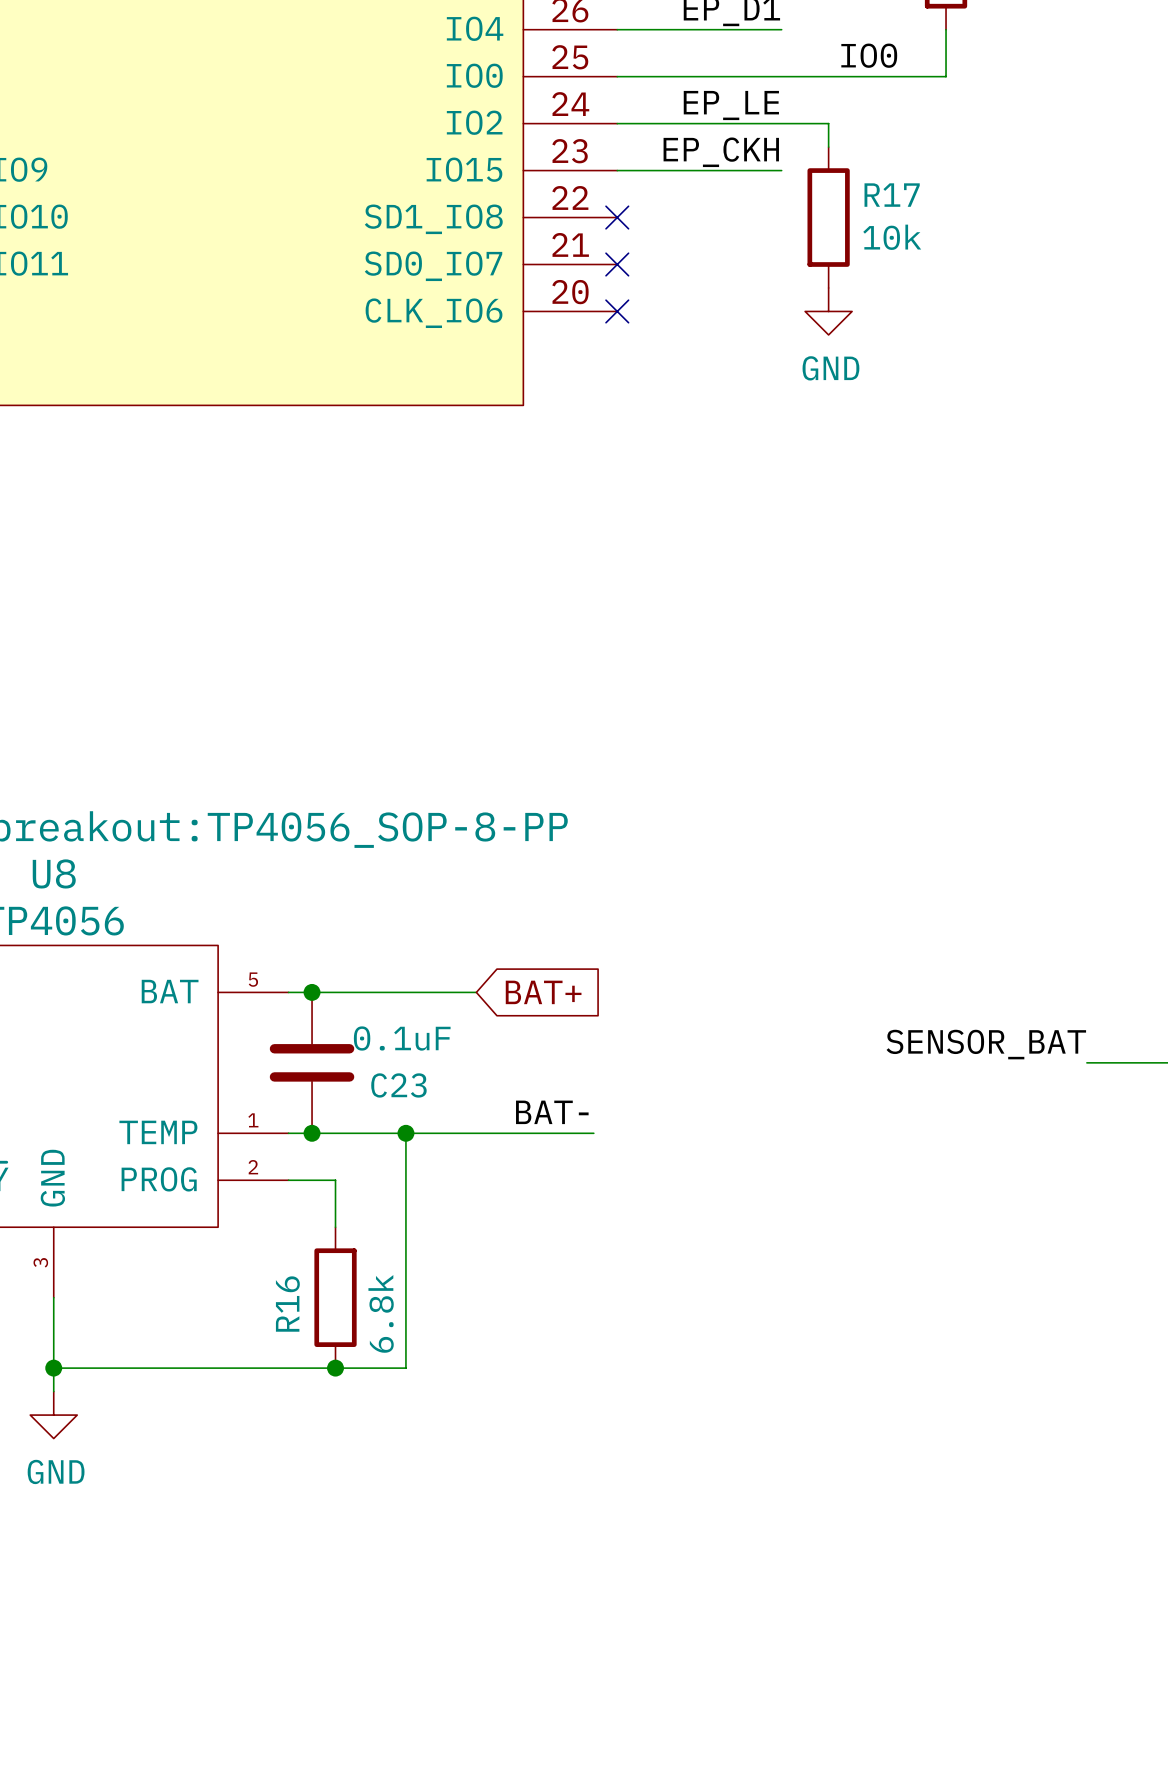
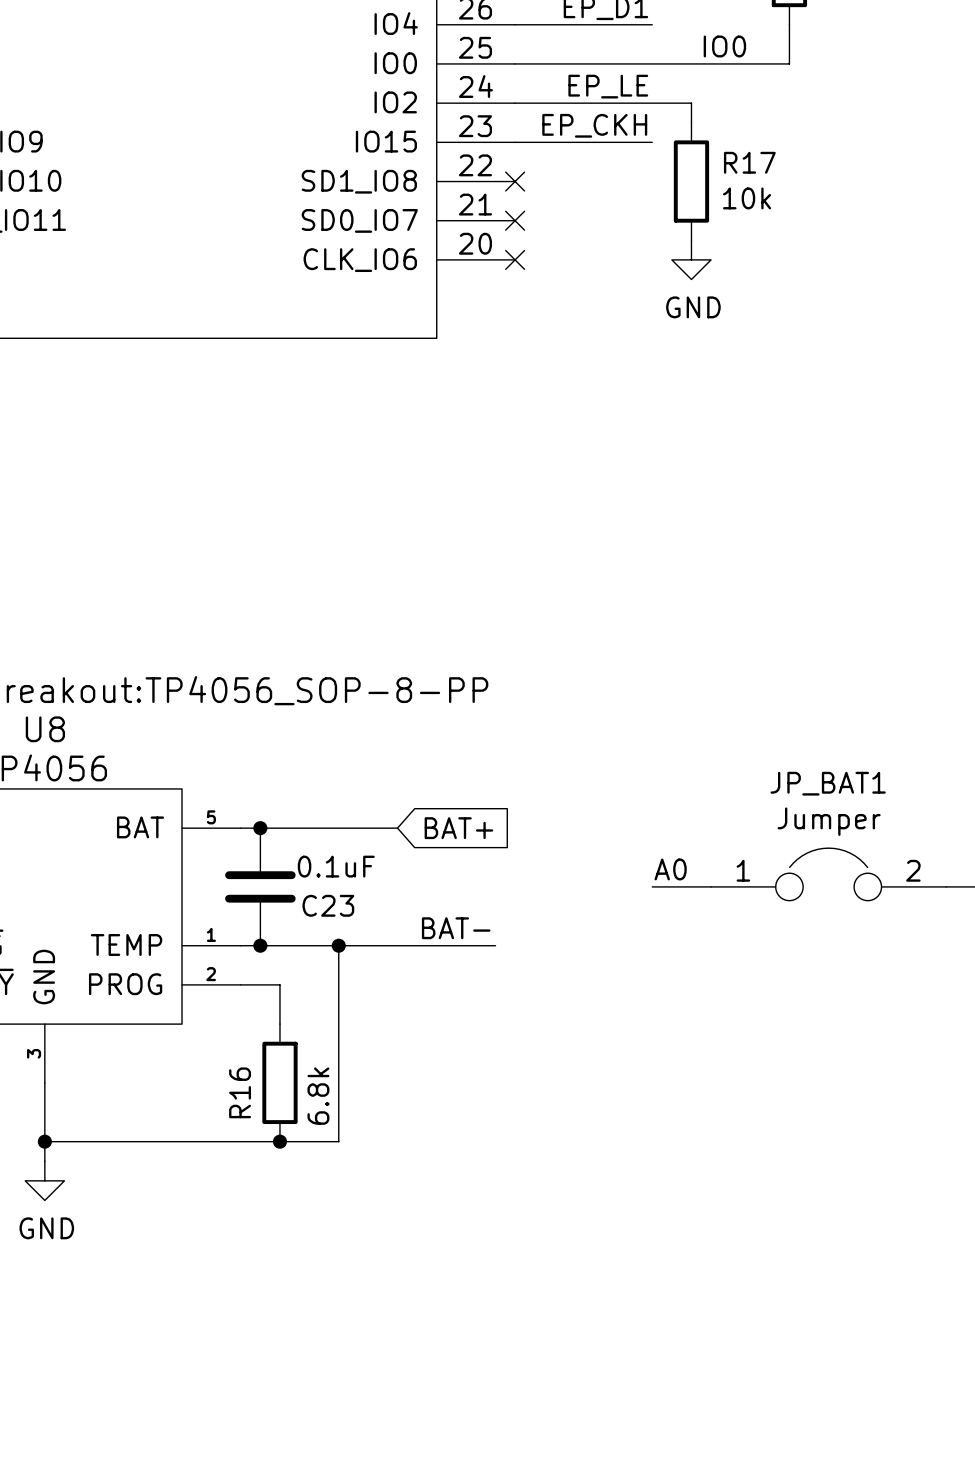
label: none -> A0 (670, 869)
label: SENSOR_BAT (986, 1044) -> none
JP_BAT1: none -> Jumper (828, 874)
wire: none -> (652, 886) (711, 886)

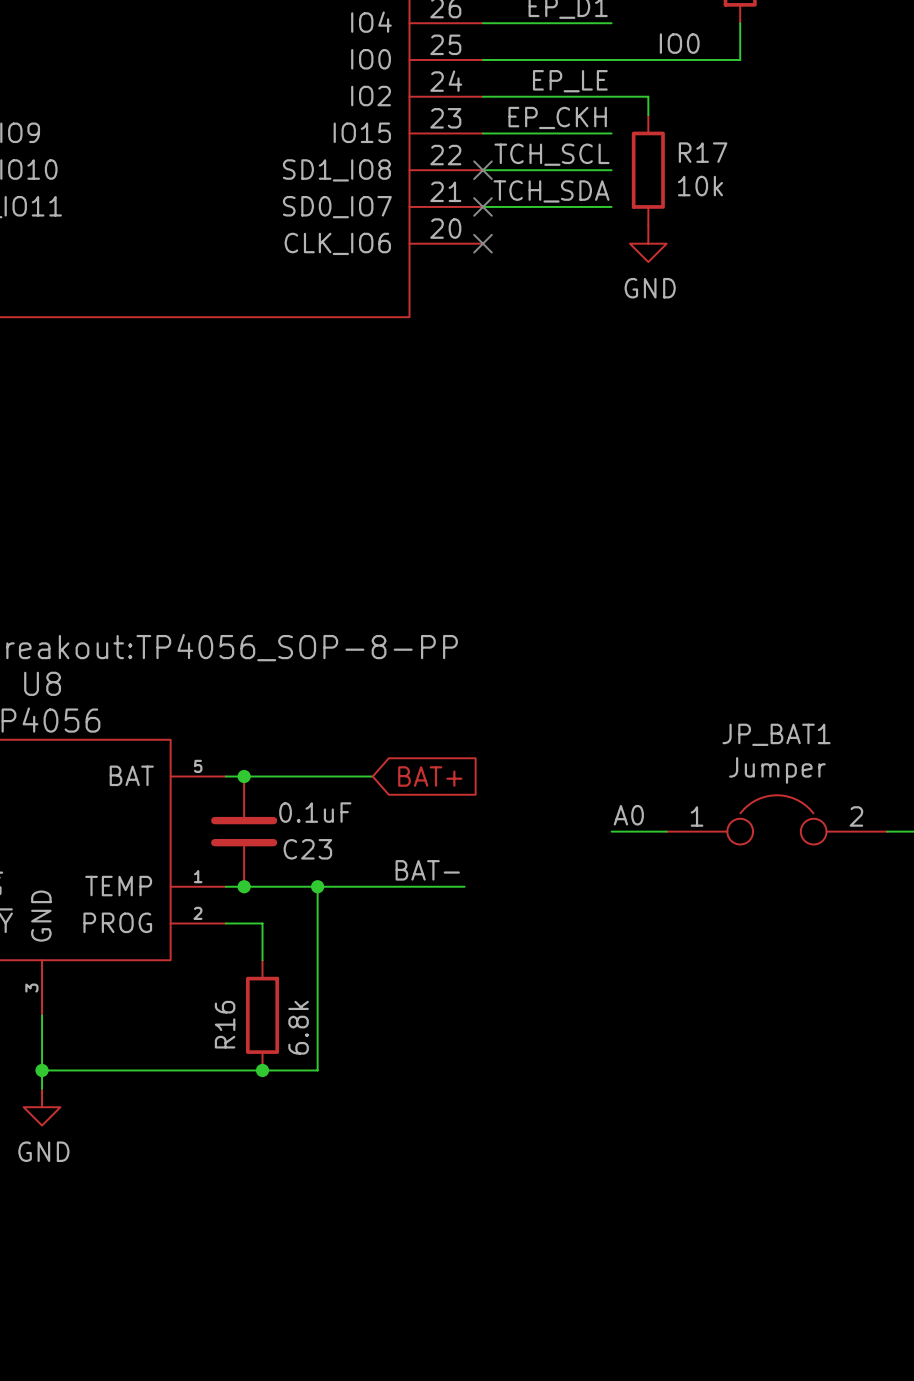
label: none -> TCH_SCL (551, 154)
wire: none -> (482, 170) (611, 170)
label: none -> TCH_SDA (551, 191)
wire: none -> (482, 206) (611, 206)

